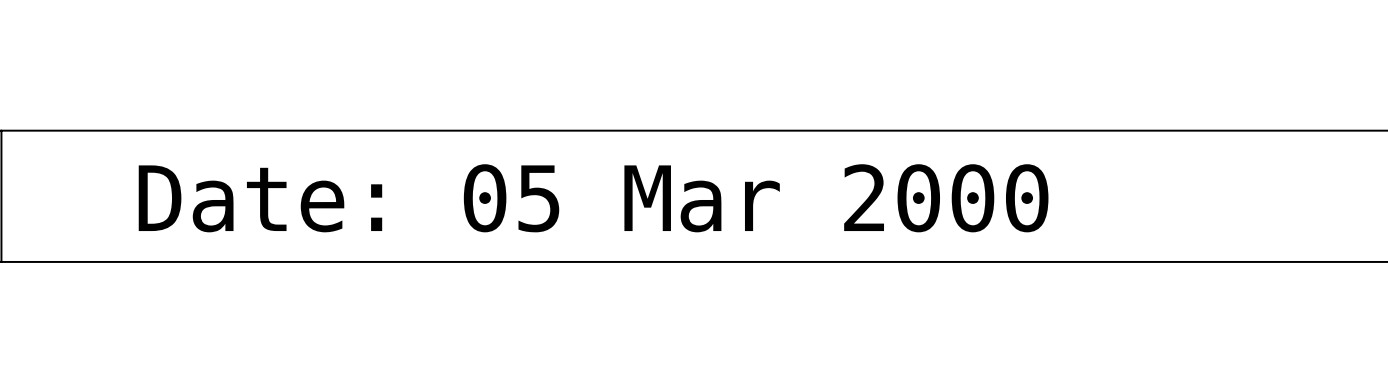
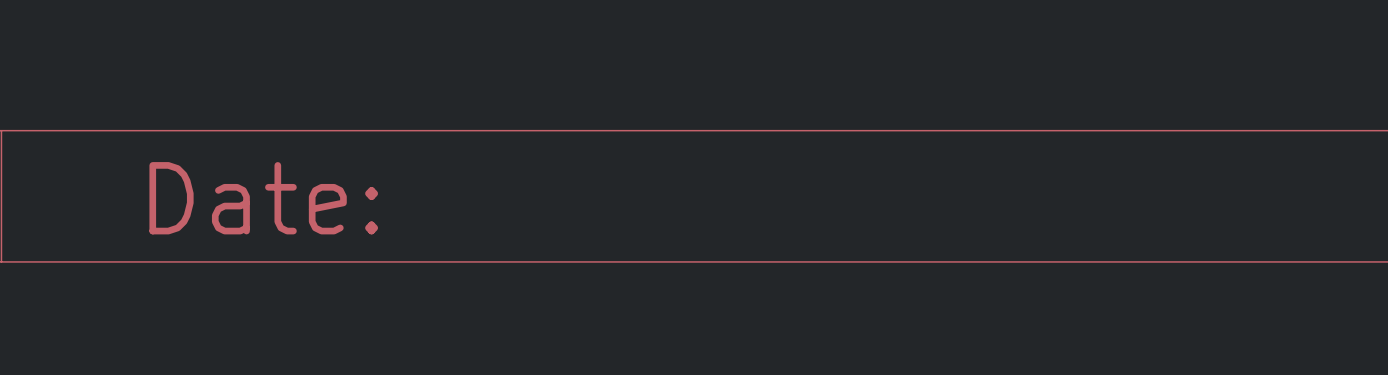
title block: Date: 05 Mar 2000 (593, 198) -> Date: (263, 198)

